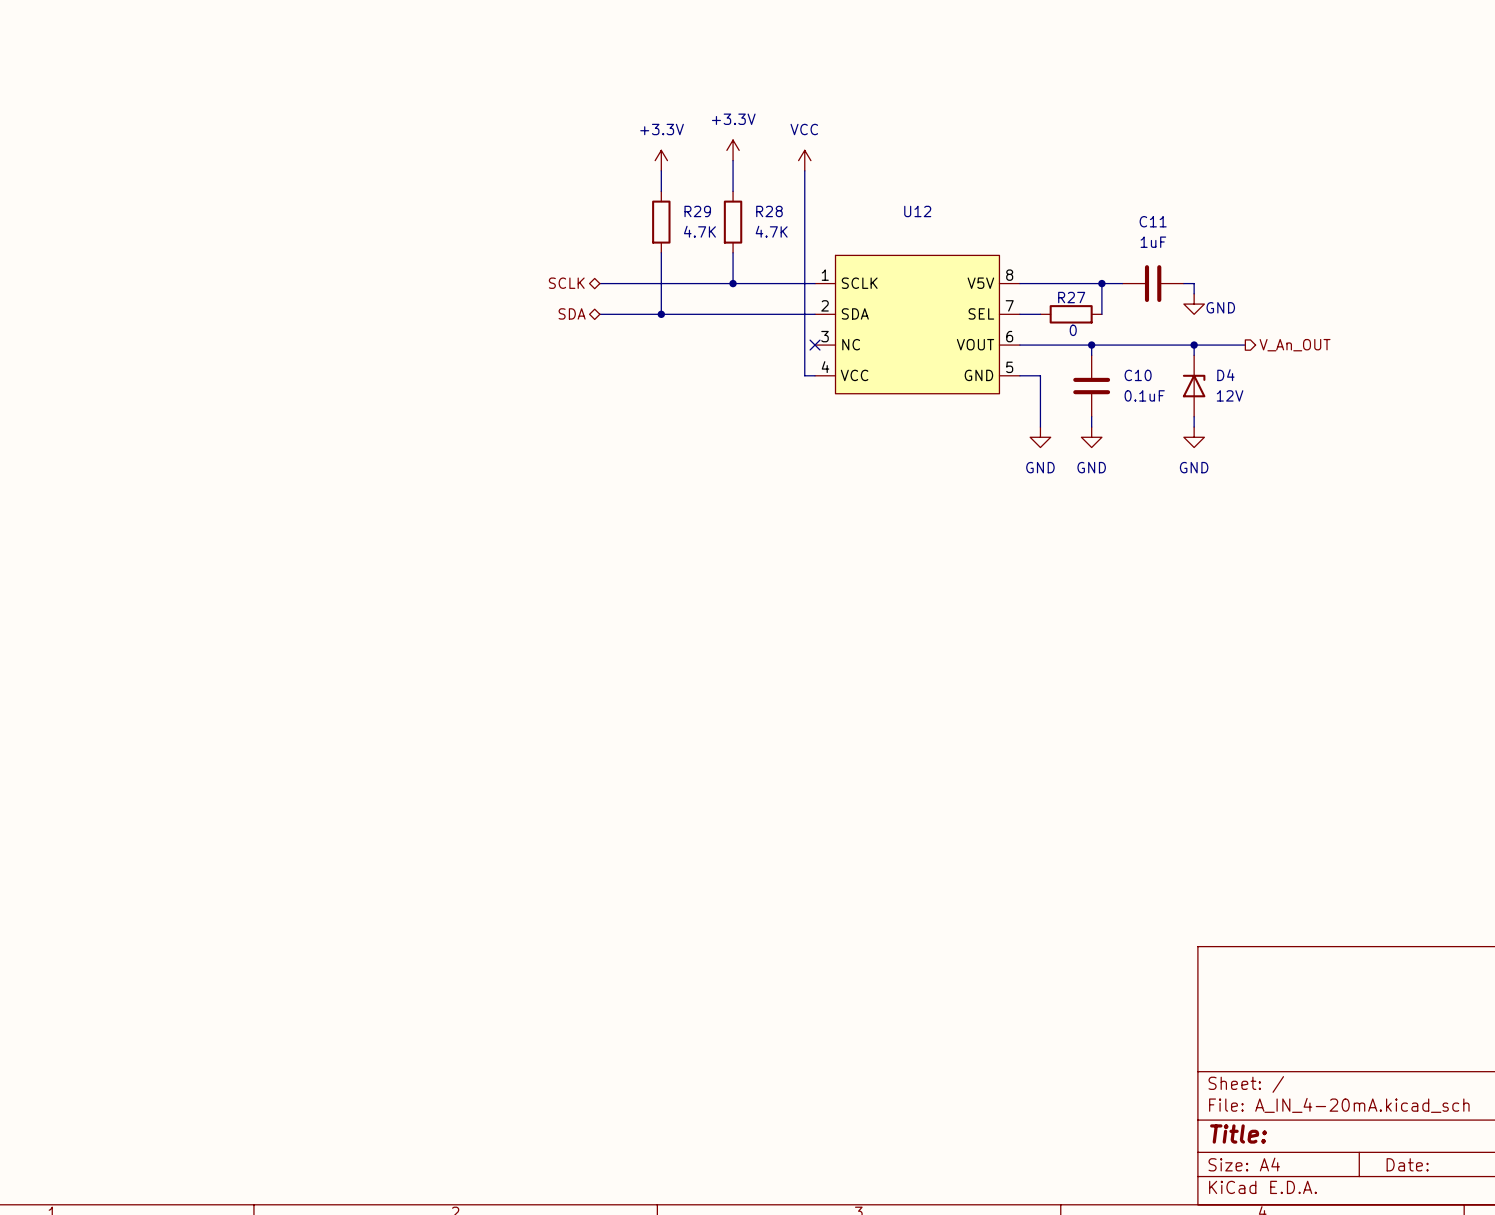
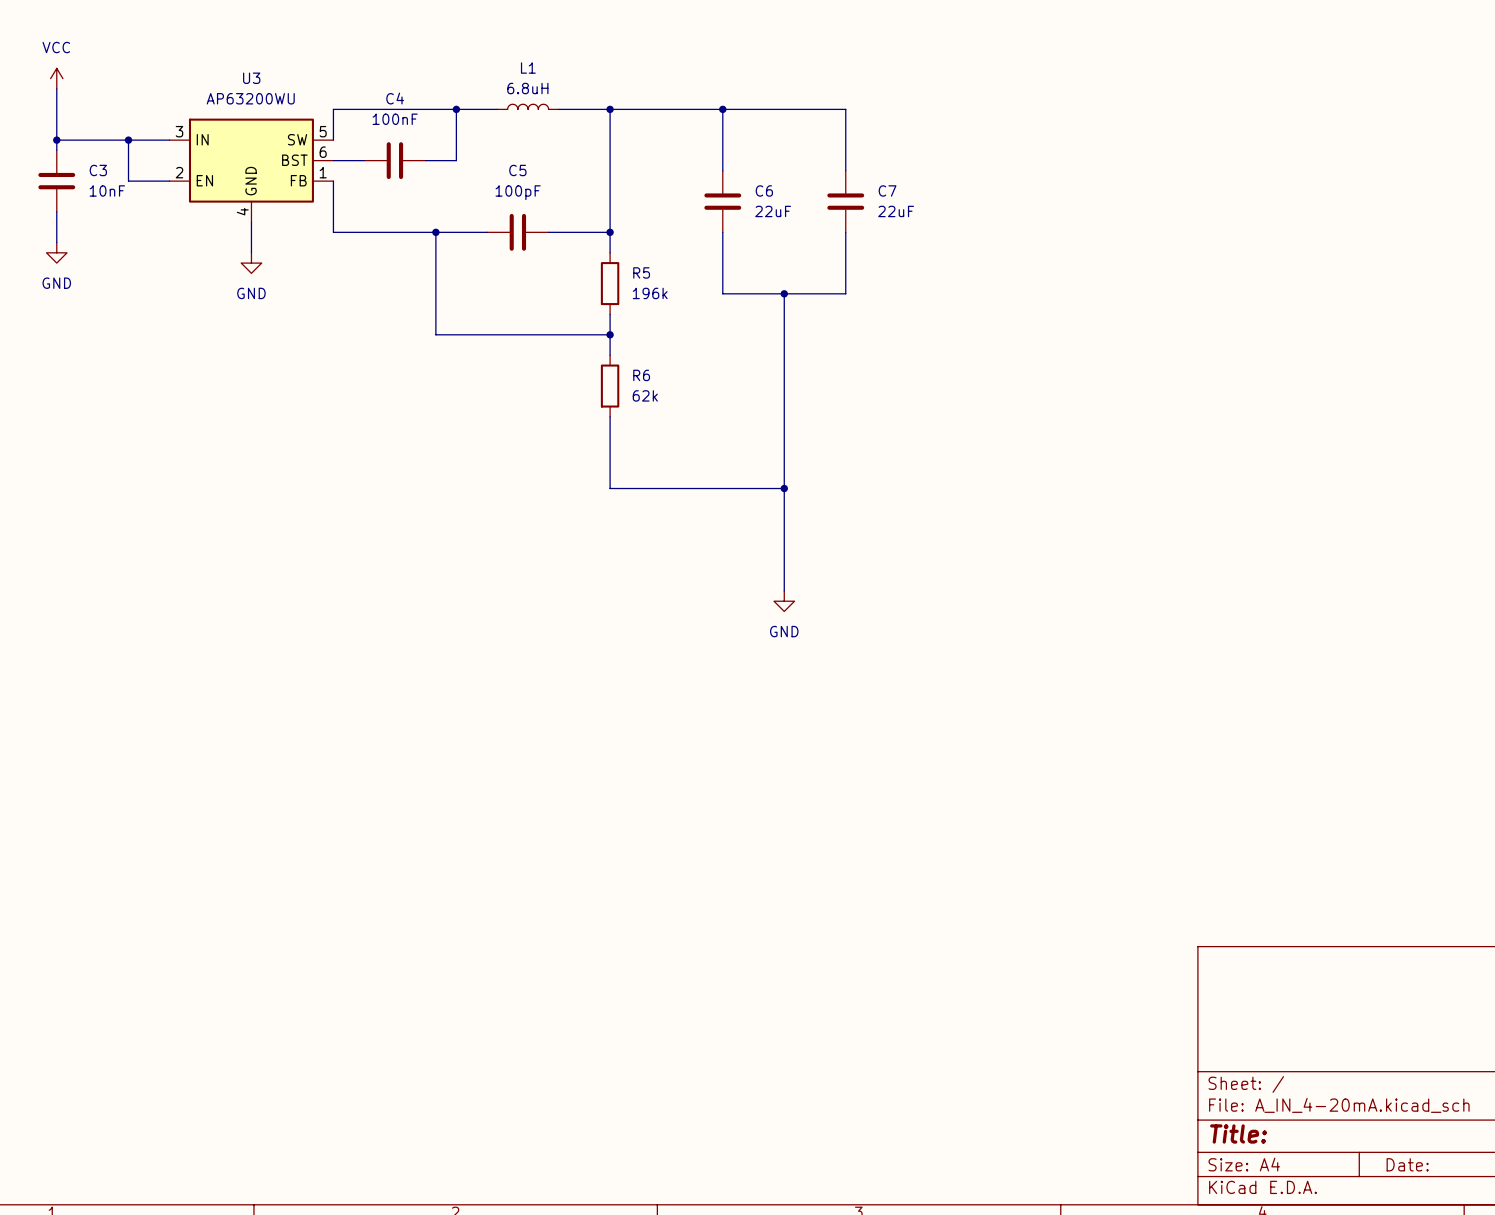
power symbol: none -> VCC (56, 78)
wire: none -> (56, 88) (56, 150)
L1: none -> 6.8uH (528, 106)
wire: none -> (456, 109) (456, 160) (425, 160)
junction: none -> (456, 109)
wire: none -> (497, 109) (333, 109) (333, 140)
wire: none -> (558, 109) (845, 109) (845, 170)
wire: none -> (610, 109) (610, 252)
junction: none -> (610, 109)
junction: none -> (722, 109)
wire: none -> (56, 140) (169, 140)
junction: none -> (56, 140)
wire: none -> (128, 140) (128, 181) (169, 181)
junction: none -> (128, 140)
power symbol: +3.3V (733, 150) -> none
wire: none -> (333, 160) (364, 160)
C4: none -> 100nF (394, 160)
power symbol: +3.3V (661, 160) -> none
wire: (733, 160) (733, 191) -> none
power symbol: VCC (804, 160) -> none
U3: none -> AP63200WU (251, 170)
wire: (661, 170) (661, 191) -> none
wire: (804, 170) (804, 375) (815, 375) -> none
C3: none -> 10nF (56, 181)
wire: none -> (333, 181) (333, 232) (487, 232)
C6: none -> 22uF (722, 201)
C7: none -> 22uF (845, 201)
wire: none -> (56, 211) (56, 242)
wire: none -> (251, 222) (251, 252)
R29: 4.7K (661, 222) -> none
R28: 4.7K (733, 222) -> none
wire: none -> (435, 232) (435, 334) (610, 334)
junction: none -> (435, 232)
C5: none -> 100pF (517, 232)
wire: none -> (548, 232) (610, 232)
junction: none -> (610, 232)
wire: none -> (722, 232) (722, 293) (845, 293) (845, 232)
power symbol: none -> GND (56, 252)
wire: (661, 252) (661, 314) -> (722, 109) (722, 170)
wire: (733, 252) (733, 283) -> none
power symbol: none -> GND (251, 263)
hierarchical label: SCLK (566, 283) -> none
wire: (599, 283) (815, 283) -> none
R5: none -> 196k (610, 283)
junction: (733, 283) -> none
wire: (1019, 283) (1122, 283) -> none
wire: (1101, 283) (1101, 314) -> none
junction: (1101, 283) -> none
C11: 1uF (1153, 283) -> none
wire: (1183, 283) (1194, 283) (1194, 293) -> none
wire: none -> (784, 293) (784, 590)
junction: none -> (784, 293)
power symbol: GND (1194, 304) -> none
hierarchical label: SDA (572, 313) -> none
wire: (599, 314) (815, 314) -> none
wire: none -> (610, 314) (610, 355)
junction: (661, 314) -> none
wire: (1019, 314) (1040, 314) -> none
R27: 0 (1071, 314) -> none
U12: (917, 324) -> none
junction: none -> (610, 334)
no-connect mark: (815, 345) -> none
wire: (1019, 345) (1245, 345) -> none
wire: (1091, 345) (1091, 355) -> none
junction: (1091, 345) -> none
wire: (1194, 345) (1194, 355) -> none
junction: (1194, 345) -> none
hierarchical label: V_An_OUT (1295, 345) -> none
wire: (1019, 375) (1040, 375) (1040, 427) -> none
R6: none -> 62k (610, 386)
C10: 0.1uF (1091, 386) -> none
D4: 12V (1194, 386) -> none
wire: none -> (610, 416) (610, 488) (784, 488)
wire: (1091, 416) (1091, 427) -> none
wire: (1194, 416) (1194, 427) -> none
power symbol: GND (1040, 437) -> none
power symbol: GND (1091, 437) -> none
power symbol: GND (1194, 437) -> none
junction: none -> (784, 488)
power symbol: none -> GND (784, 601)

